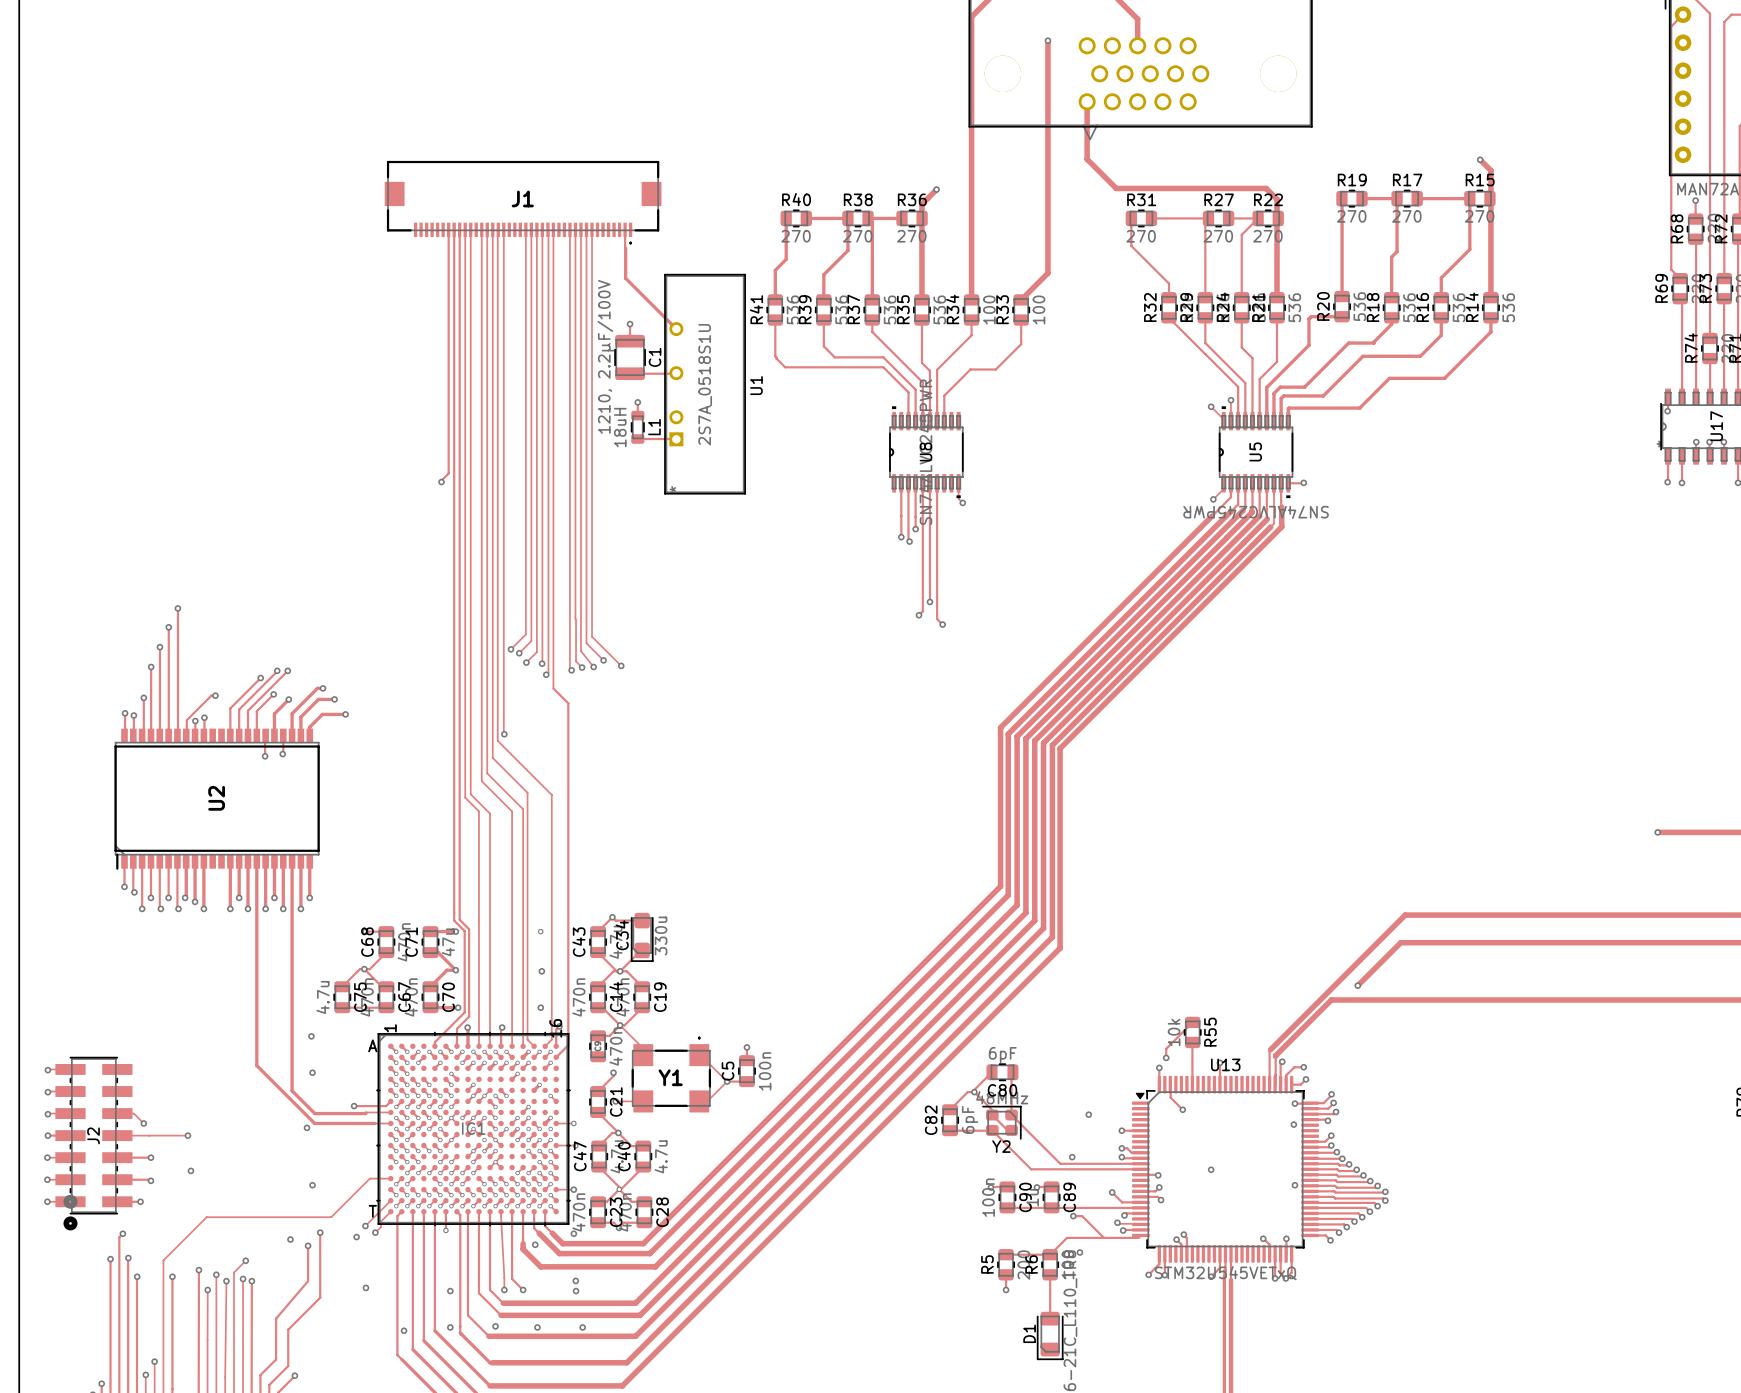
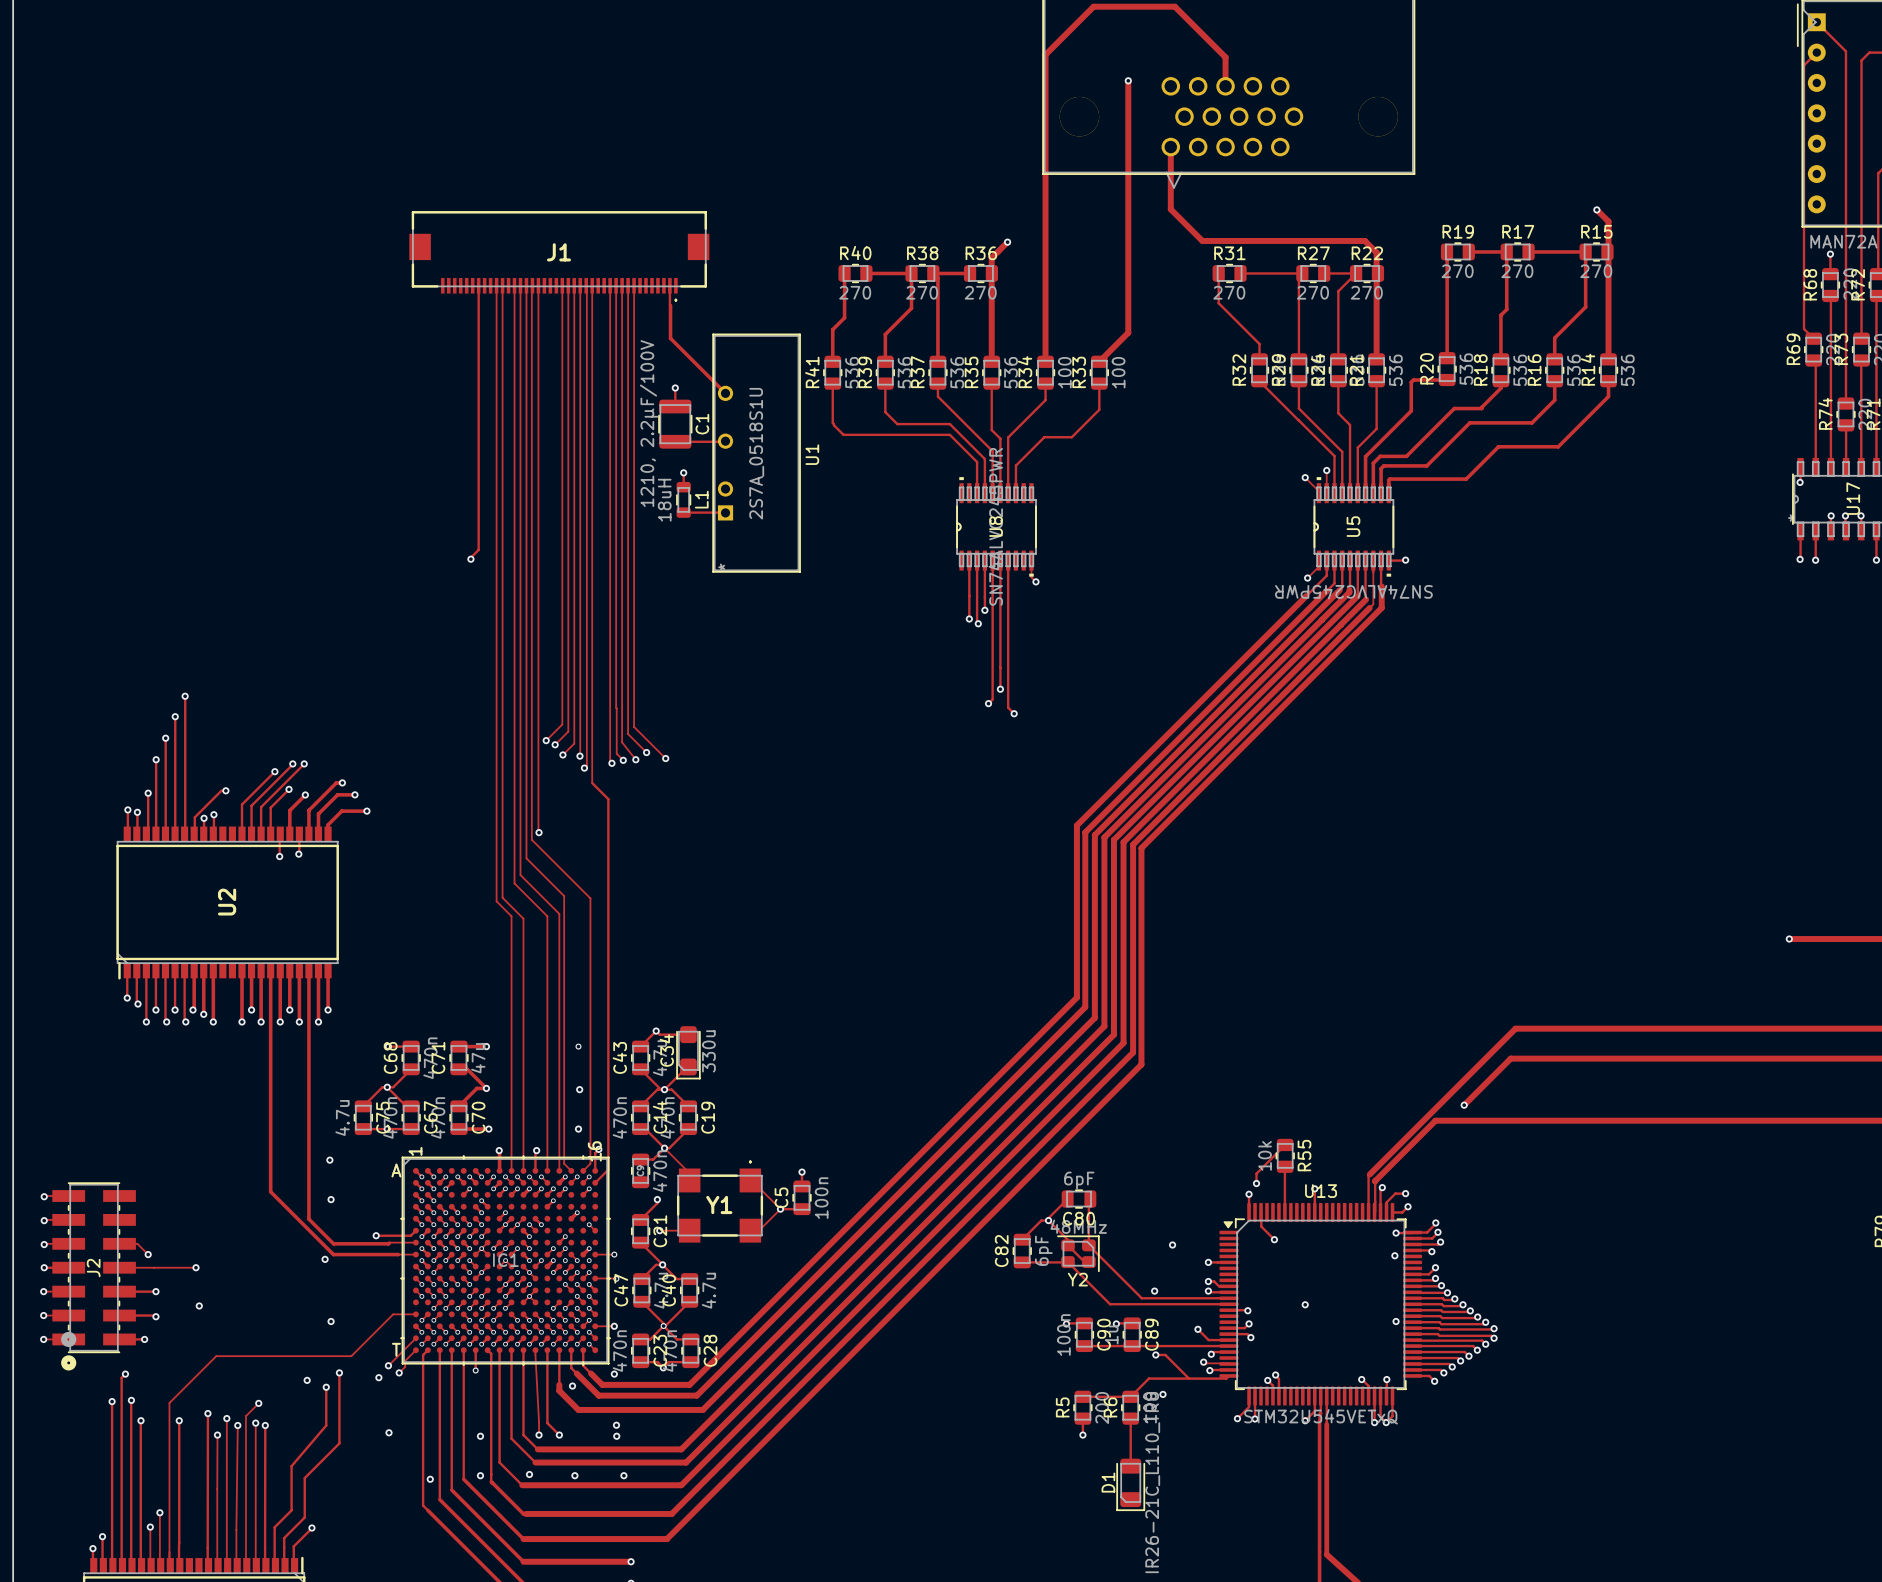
track: (454, 229) (454, 920) (464, 931) (464, 1012) (434, 1042) (434, 1046) -> none
track: (459, 229) (459, 919) (469, 929) (469, 1016) (456, 1028) (456, 1046) -> none

